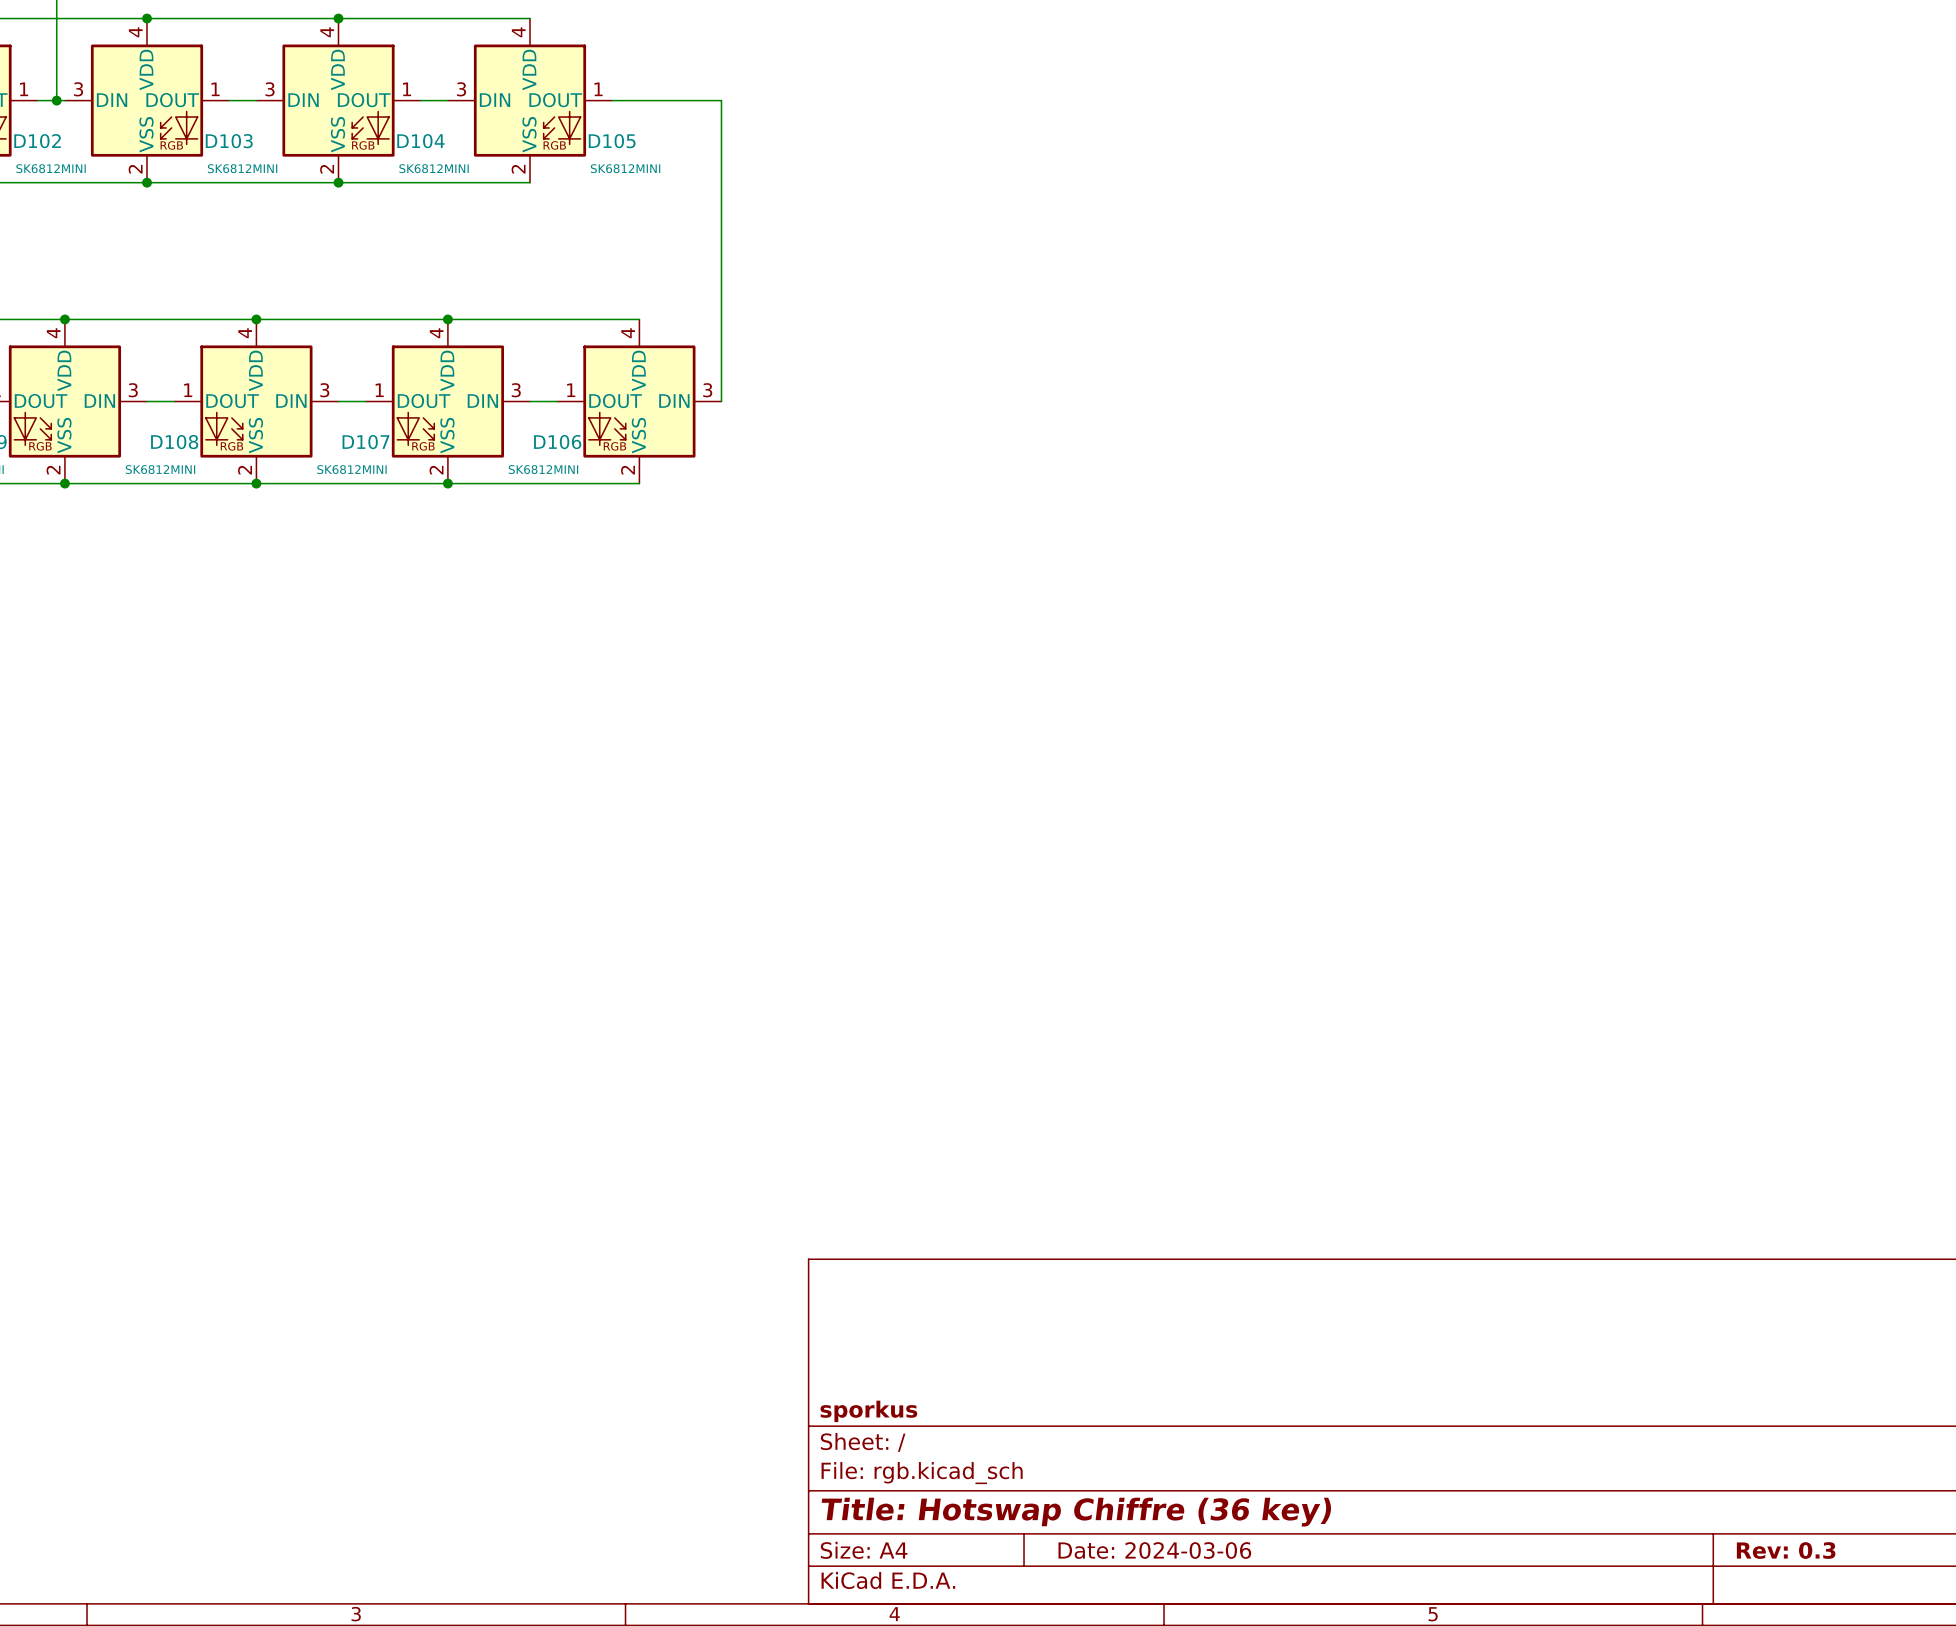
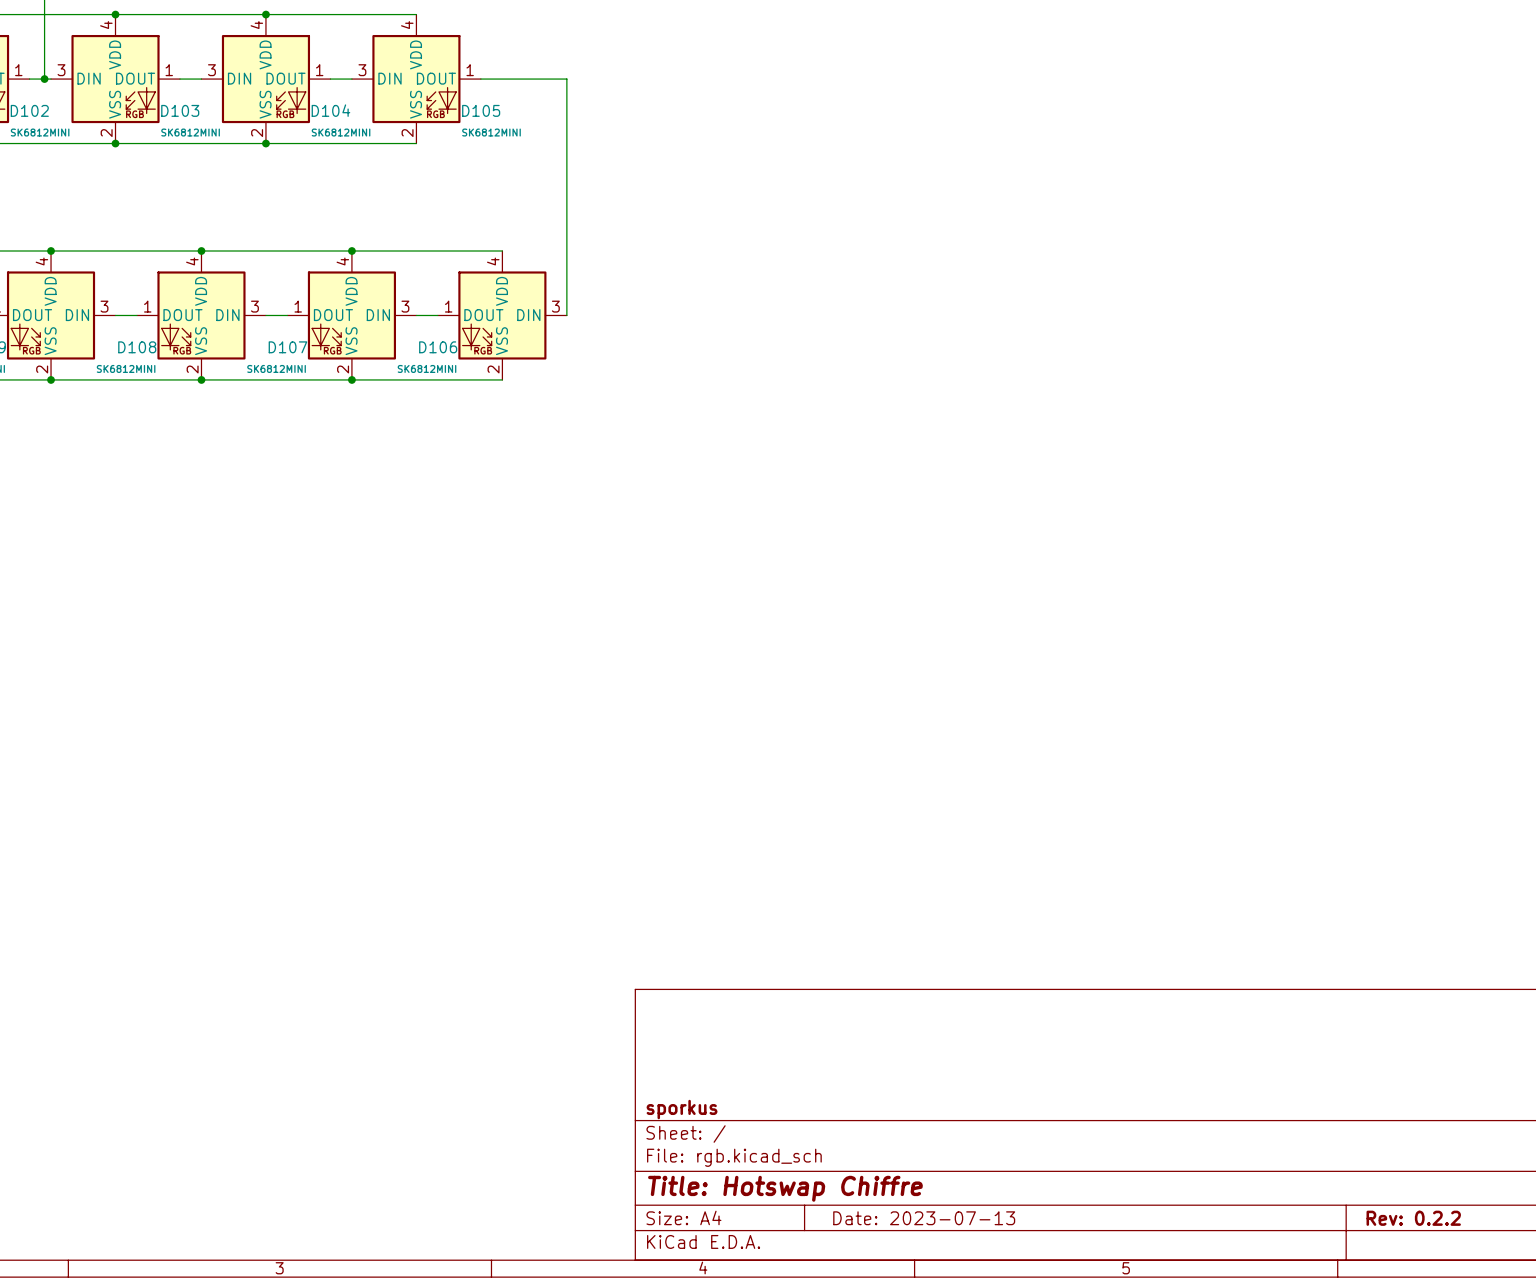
title block: Title: Hotswap Chiffre (36 key) (1076, 1512) -> Title: Hotswap Chiffre (785, 1188)
title block: Date: 2024-03-06 (1154, 1550) -> Date: 2023-07-13 (924, 1218)
title block: Rev: 0.3 (1786, 1550) -> Rev: 0.2.2 (1413, 1218)

